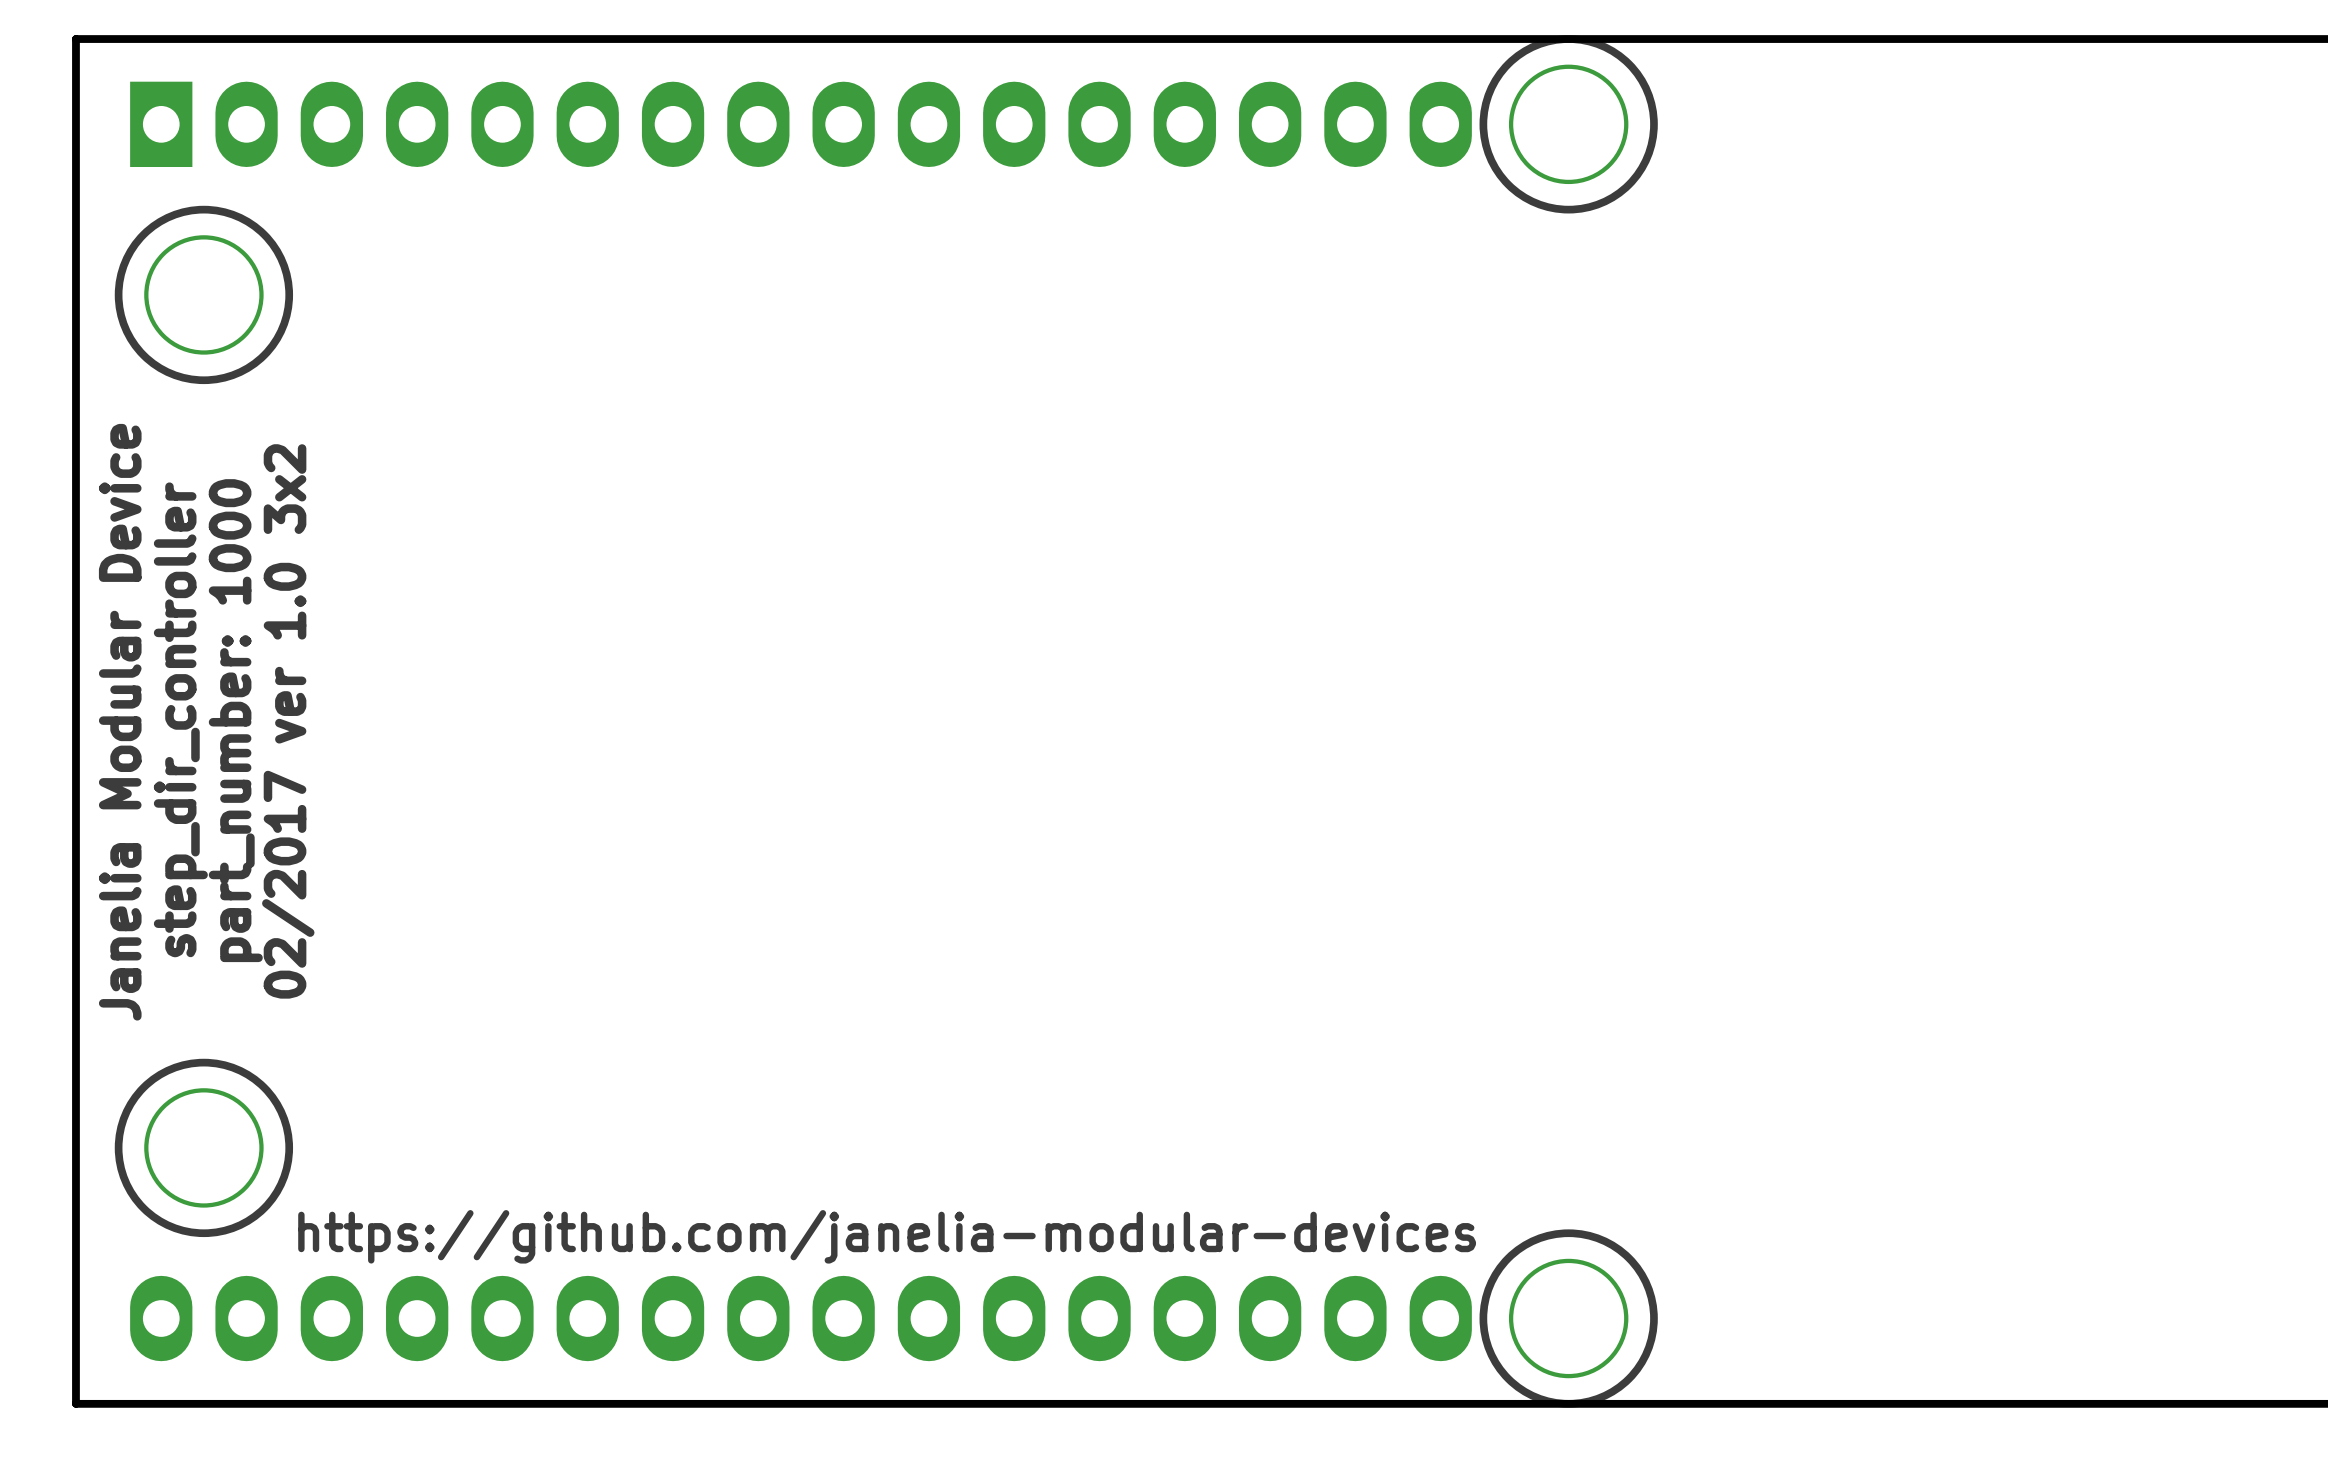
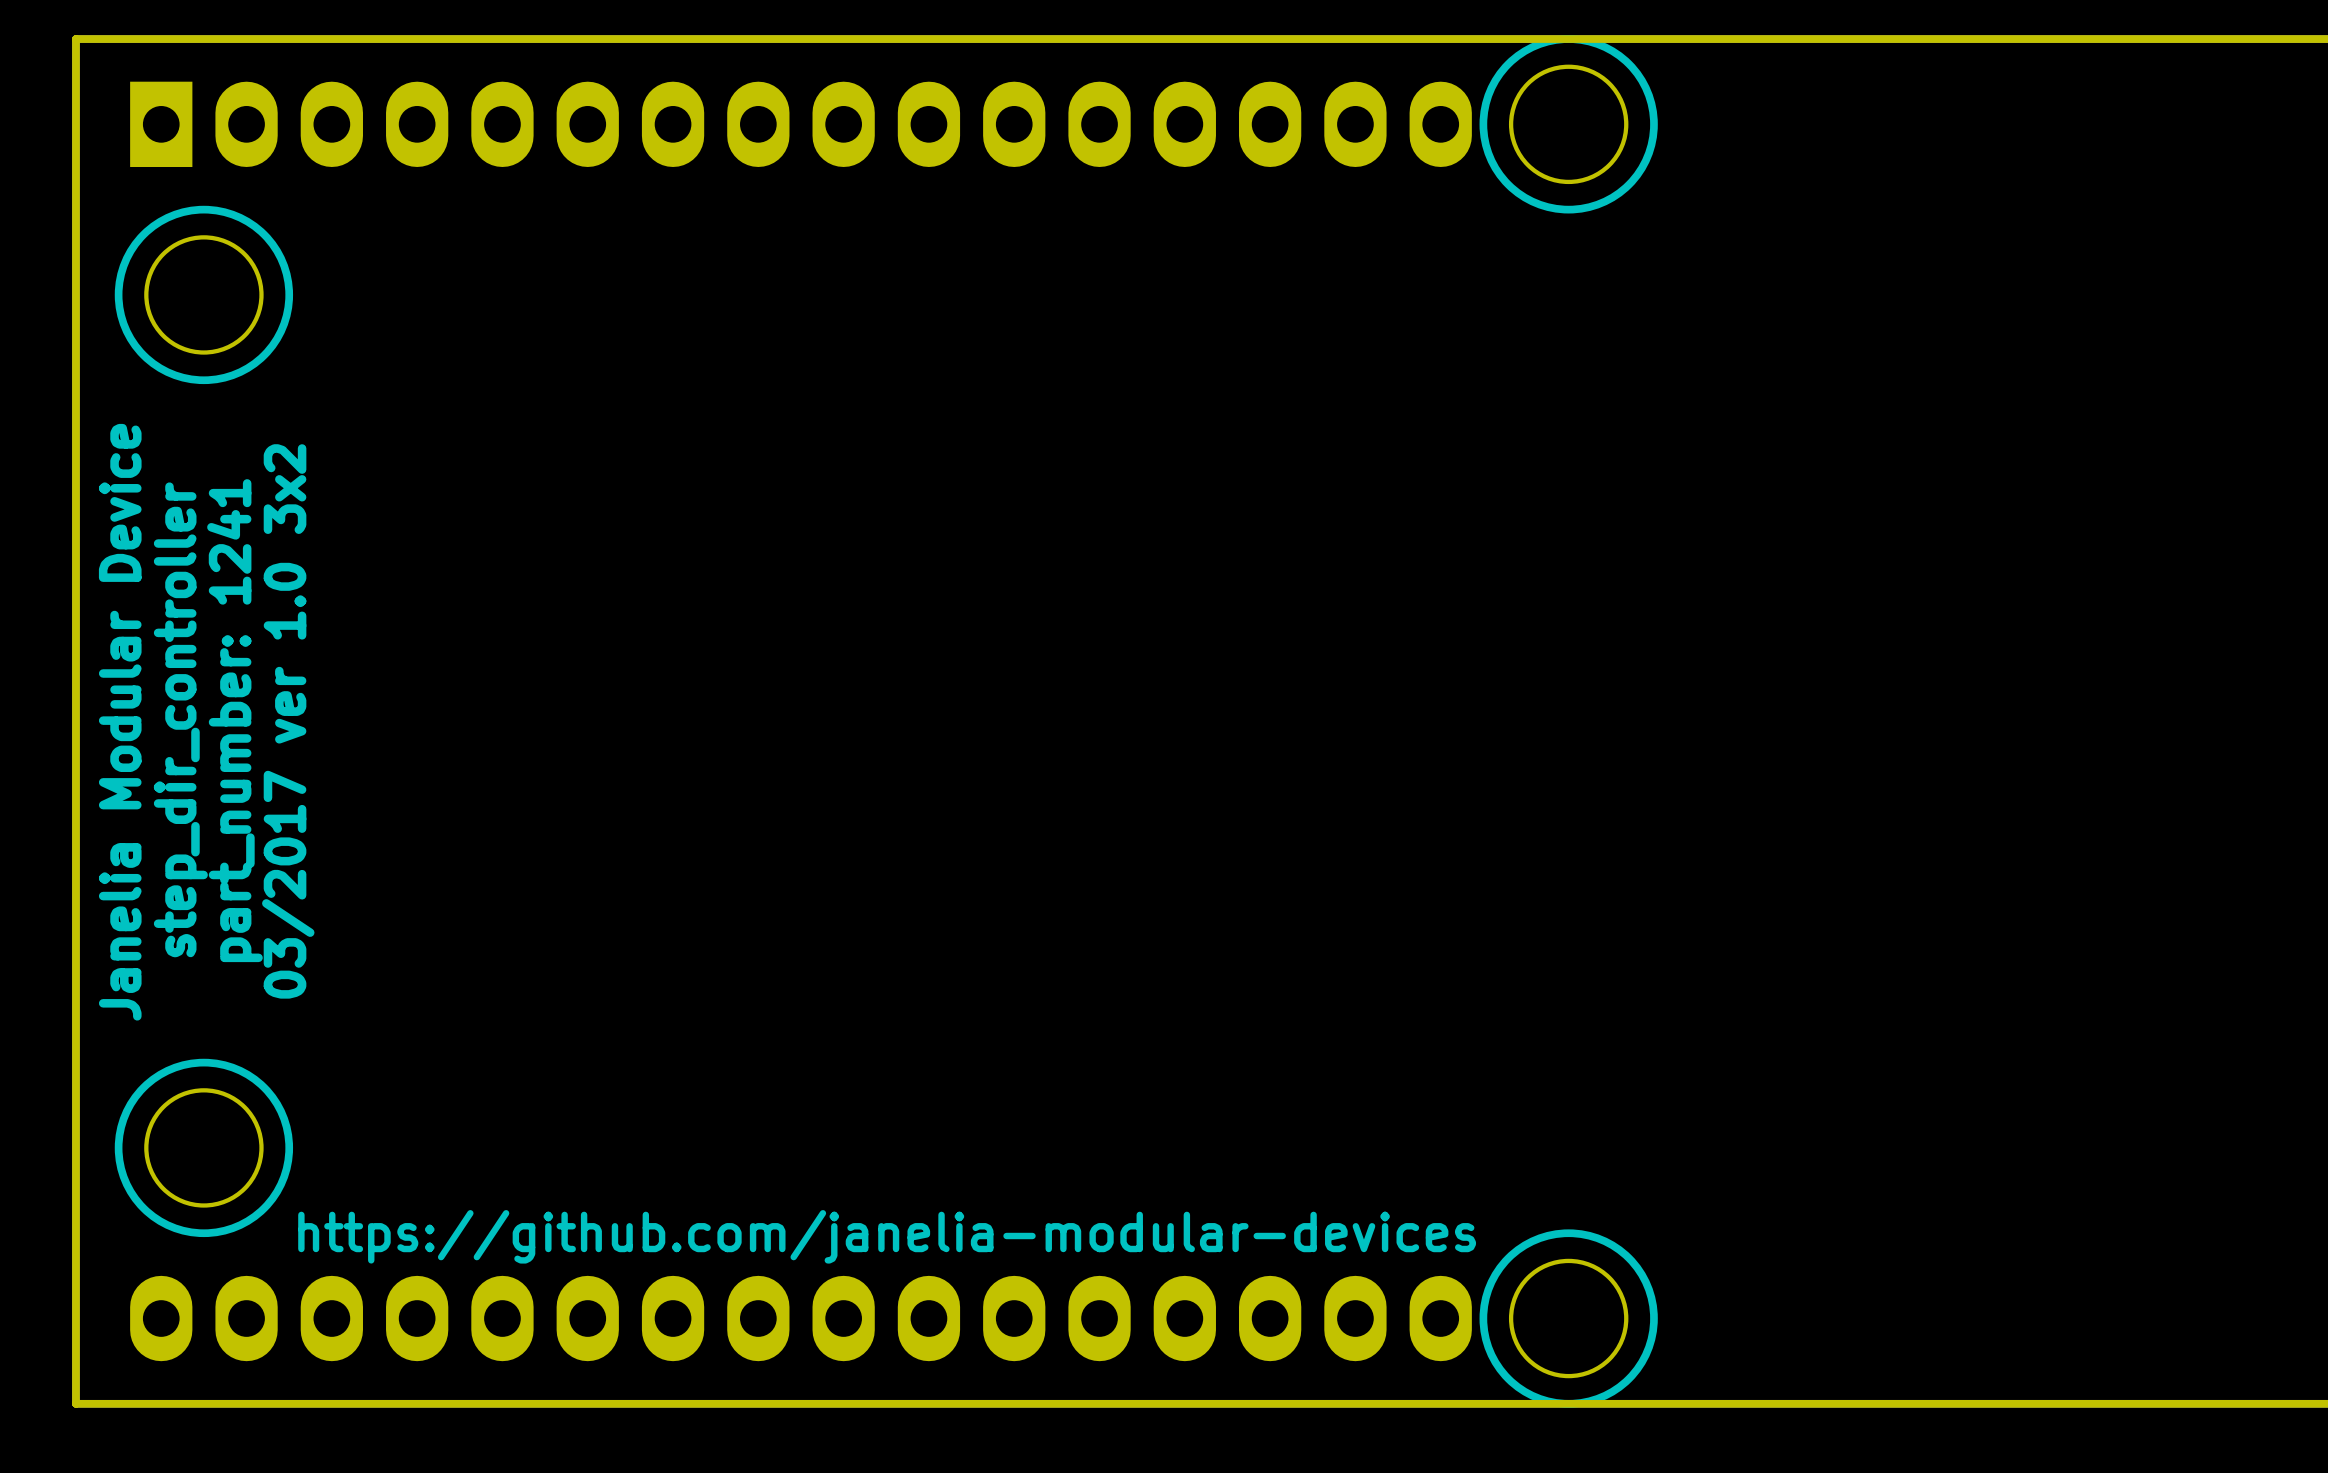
text: part_number: 1000 (235, 720) -> part_number: 1241 (234, 720)
text: 02/2017 ver 1.0 3x2 (288, 721) -> 03/2017 ver 1.0 3x2 (288, 721)

